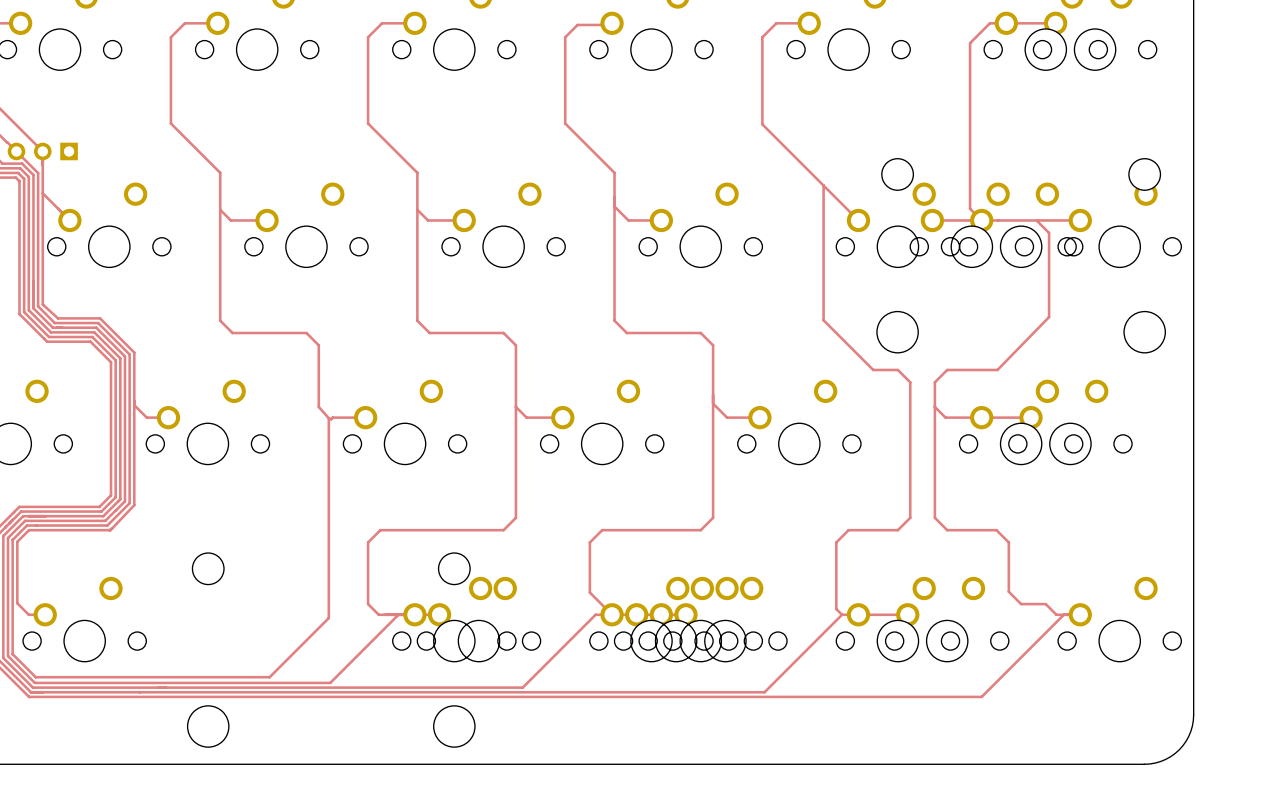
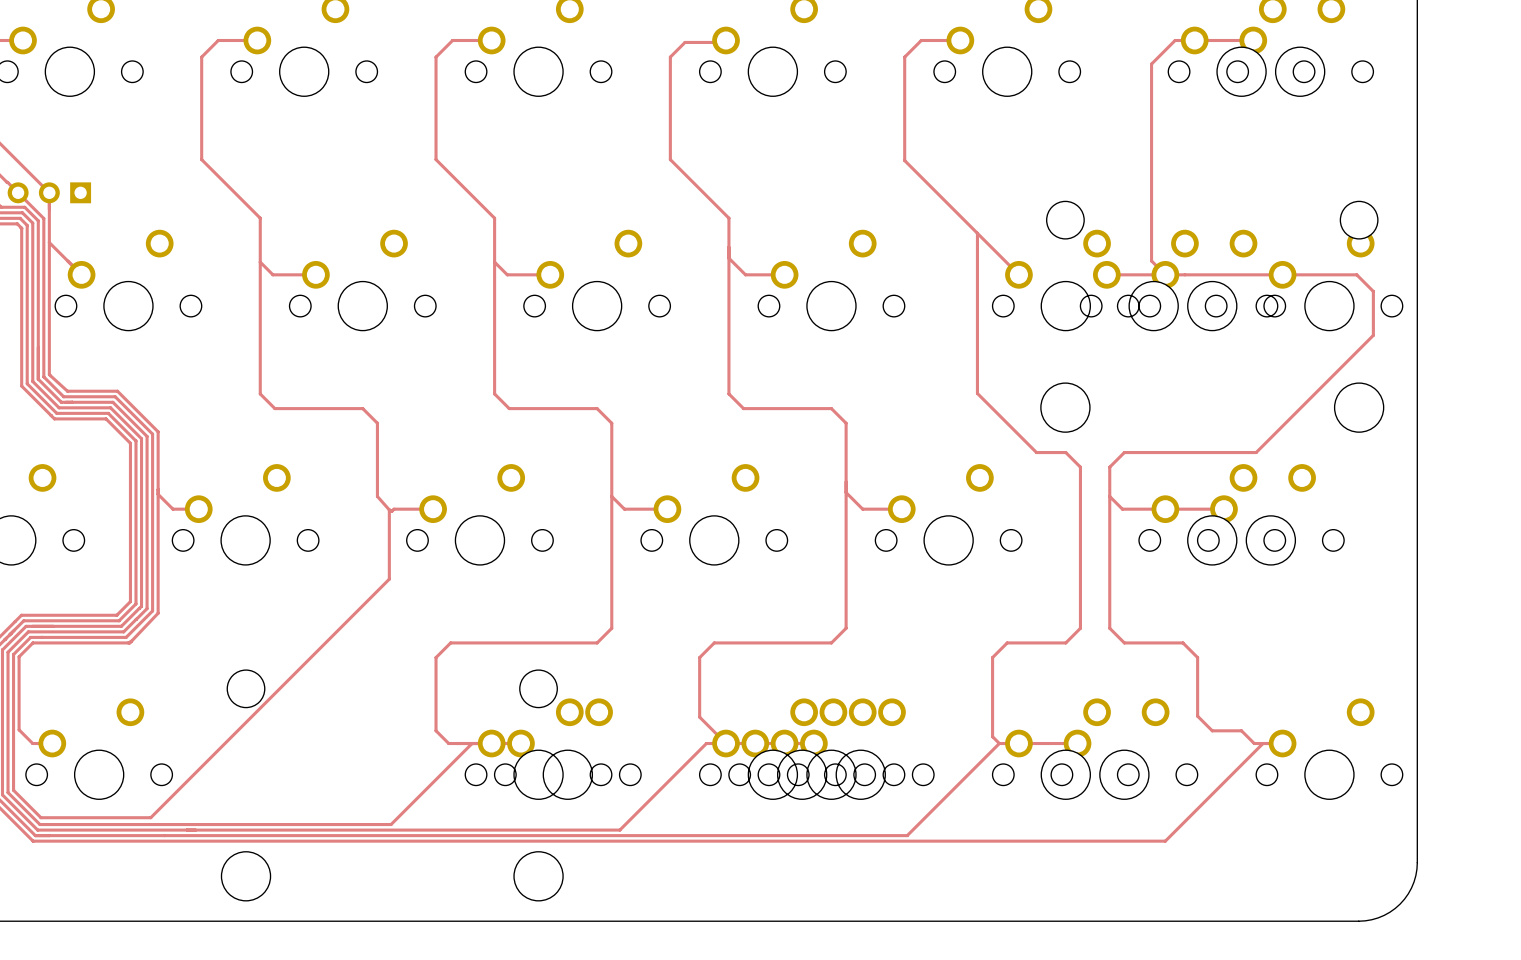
track: (1037, 220) (1049, 232) (1049, 317) (997, 369) -> (1282, 274) (1356, 274) (1373, 291) (1373, 335) (1256, 452) (1184, 452)
track: (328, 476) (328, 618) (269, 677) (128, 677) -> (389, 579) (150, 817)

